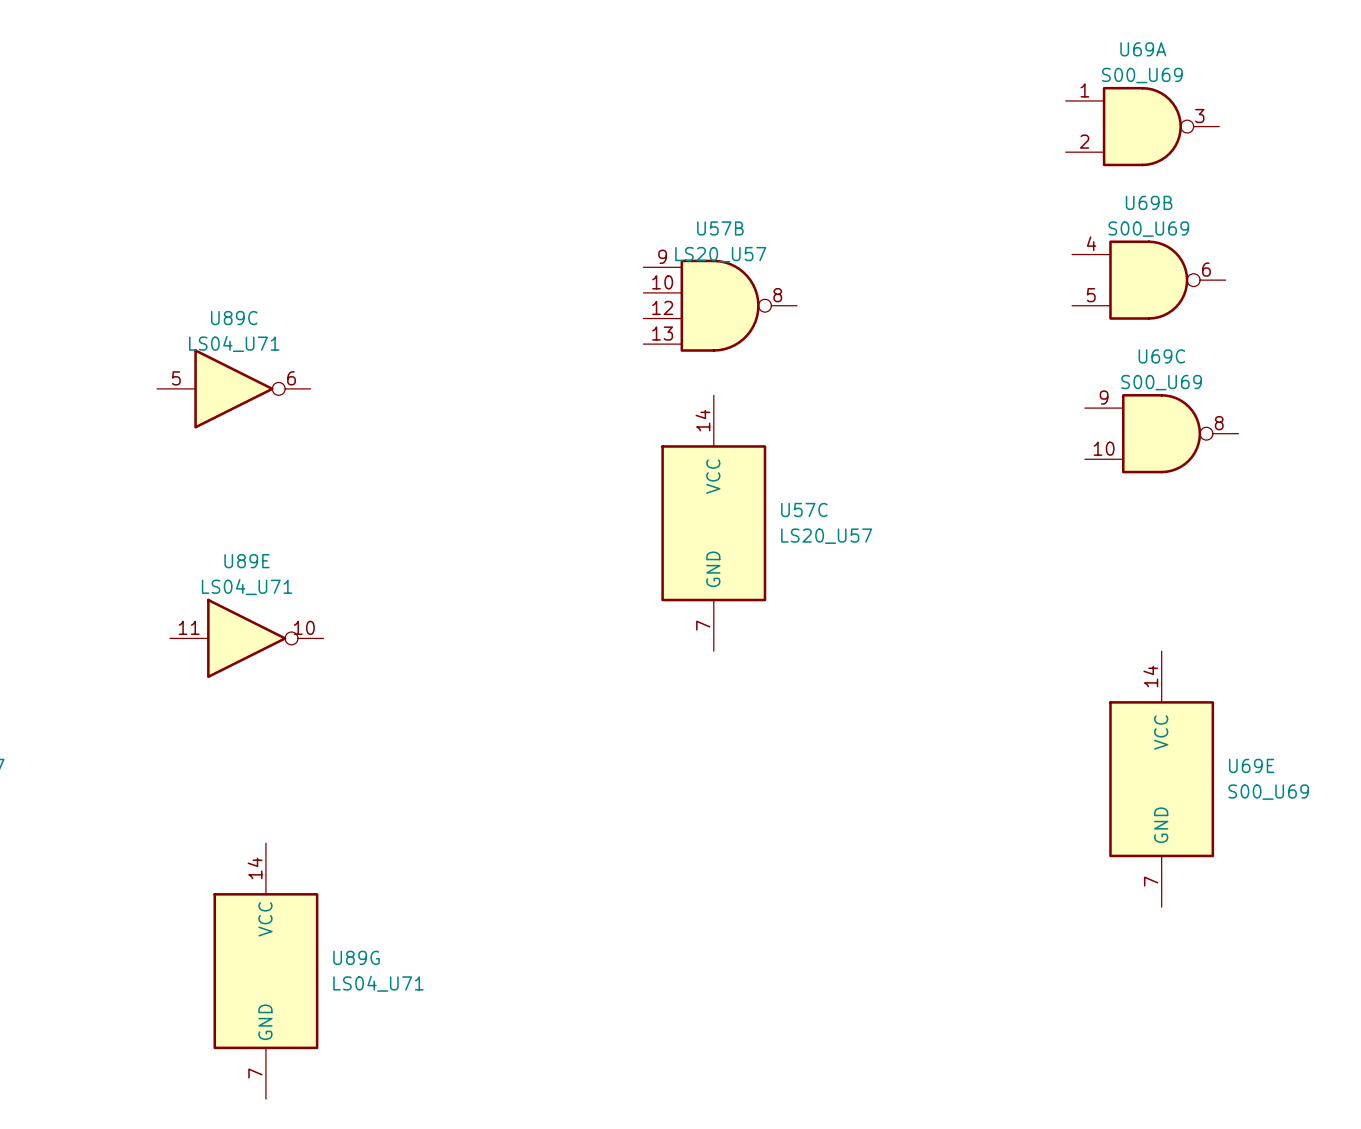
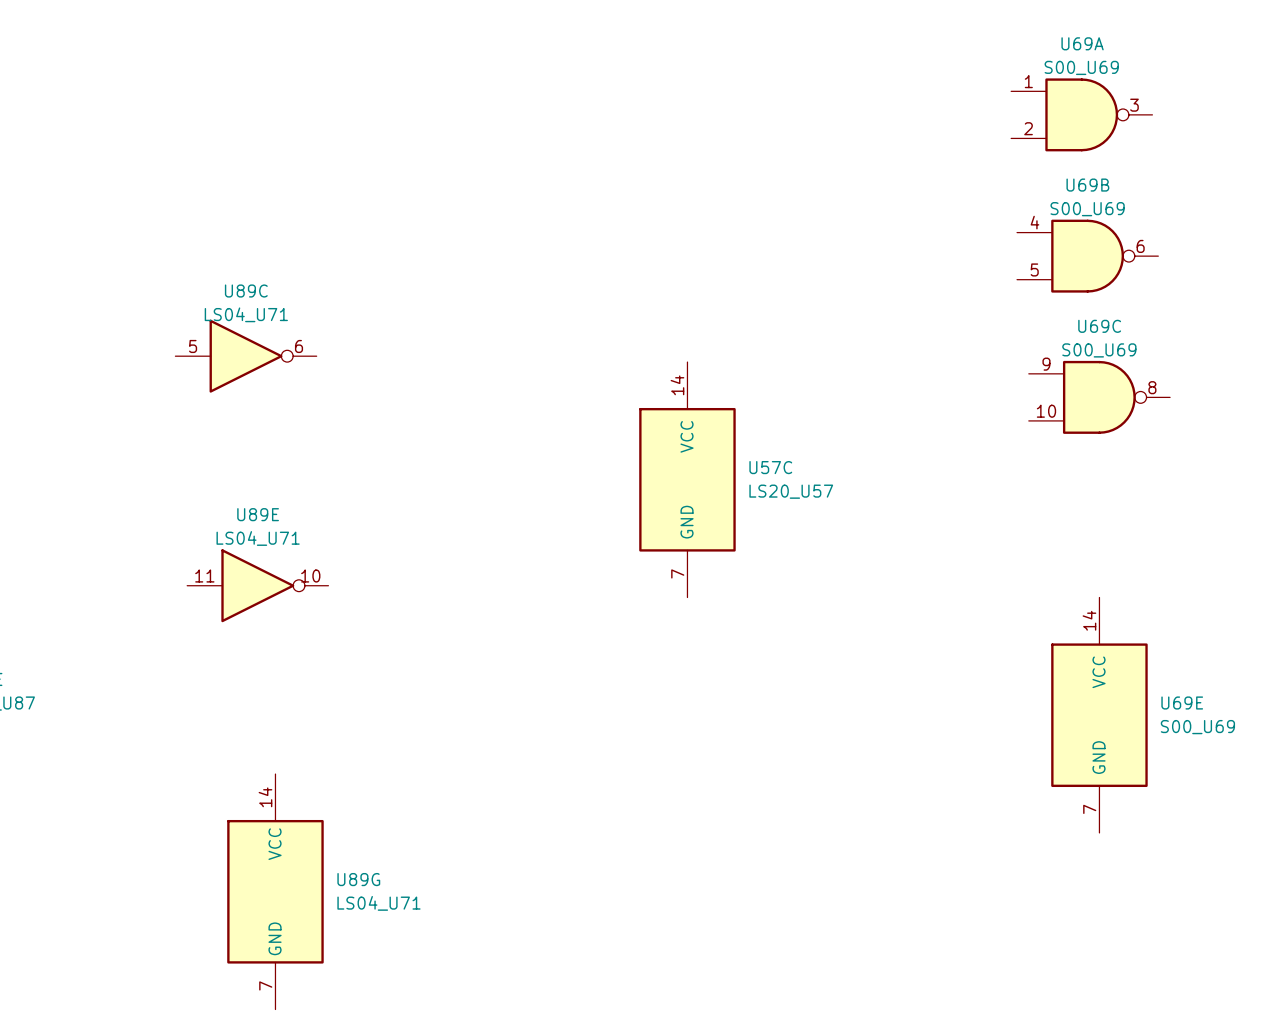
U57B: LS20_U57 (720, 305) -> none

